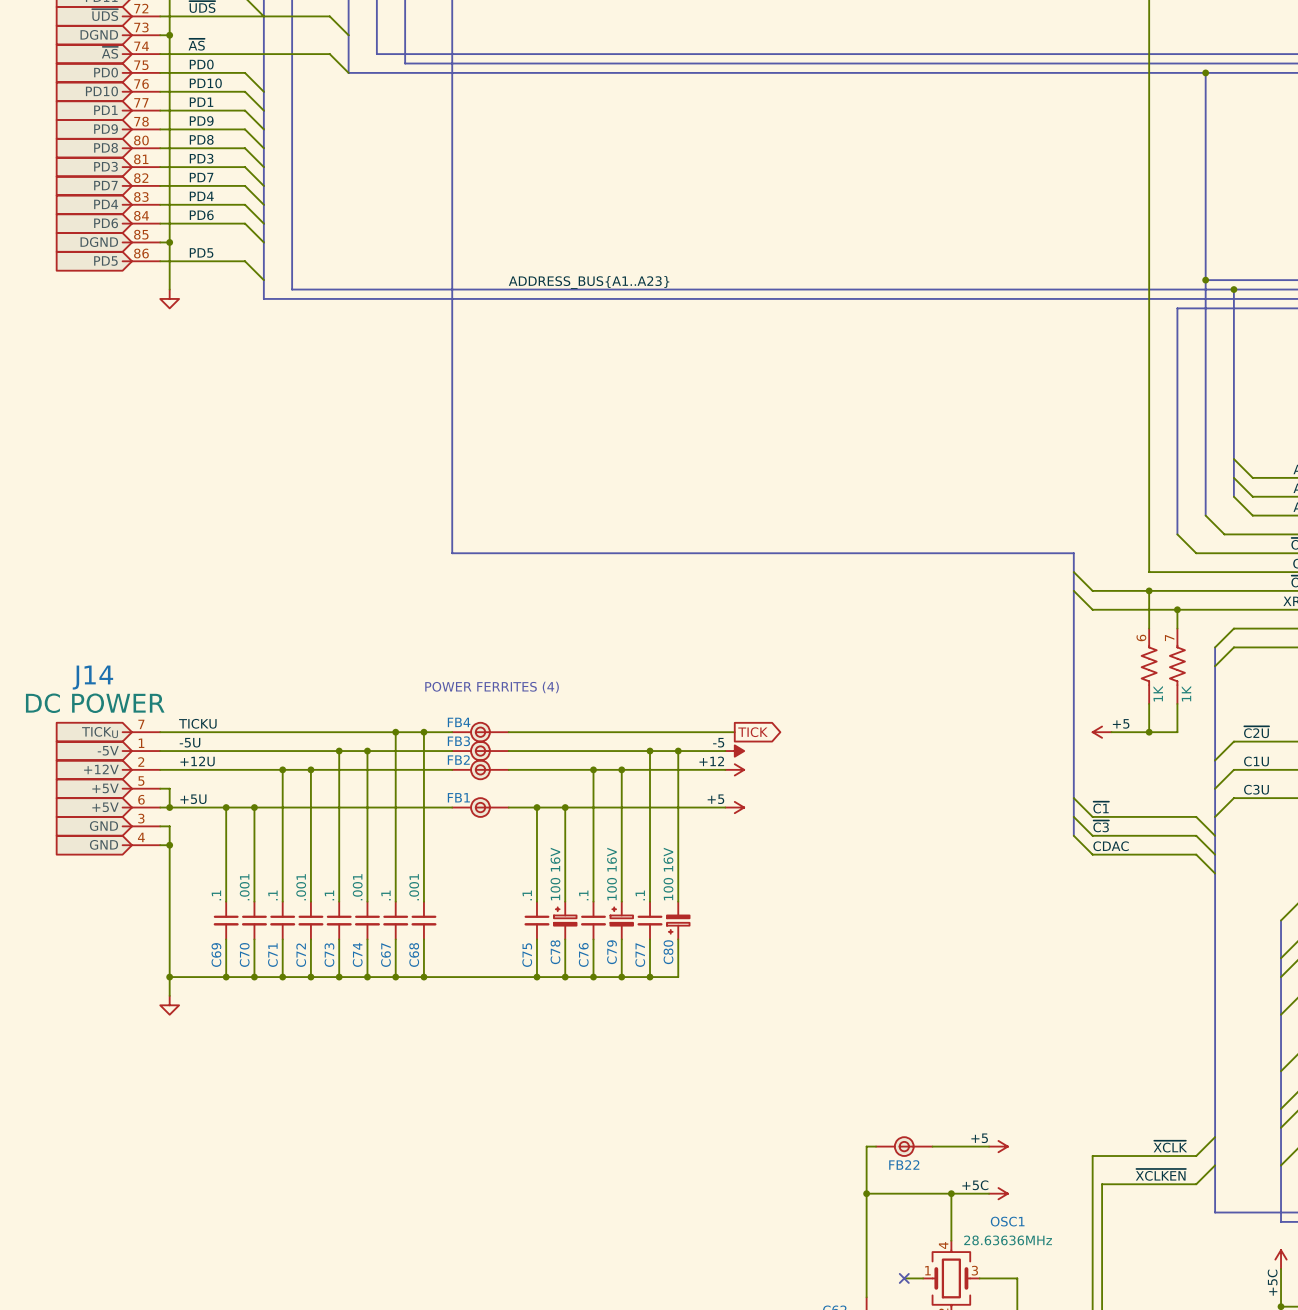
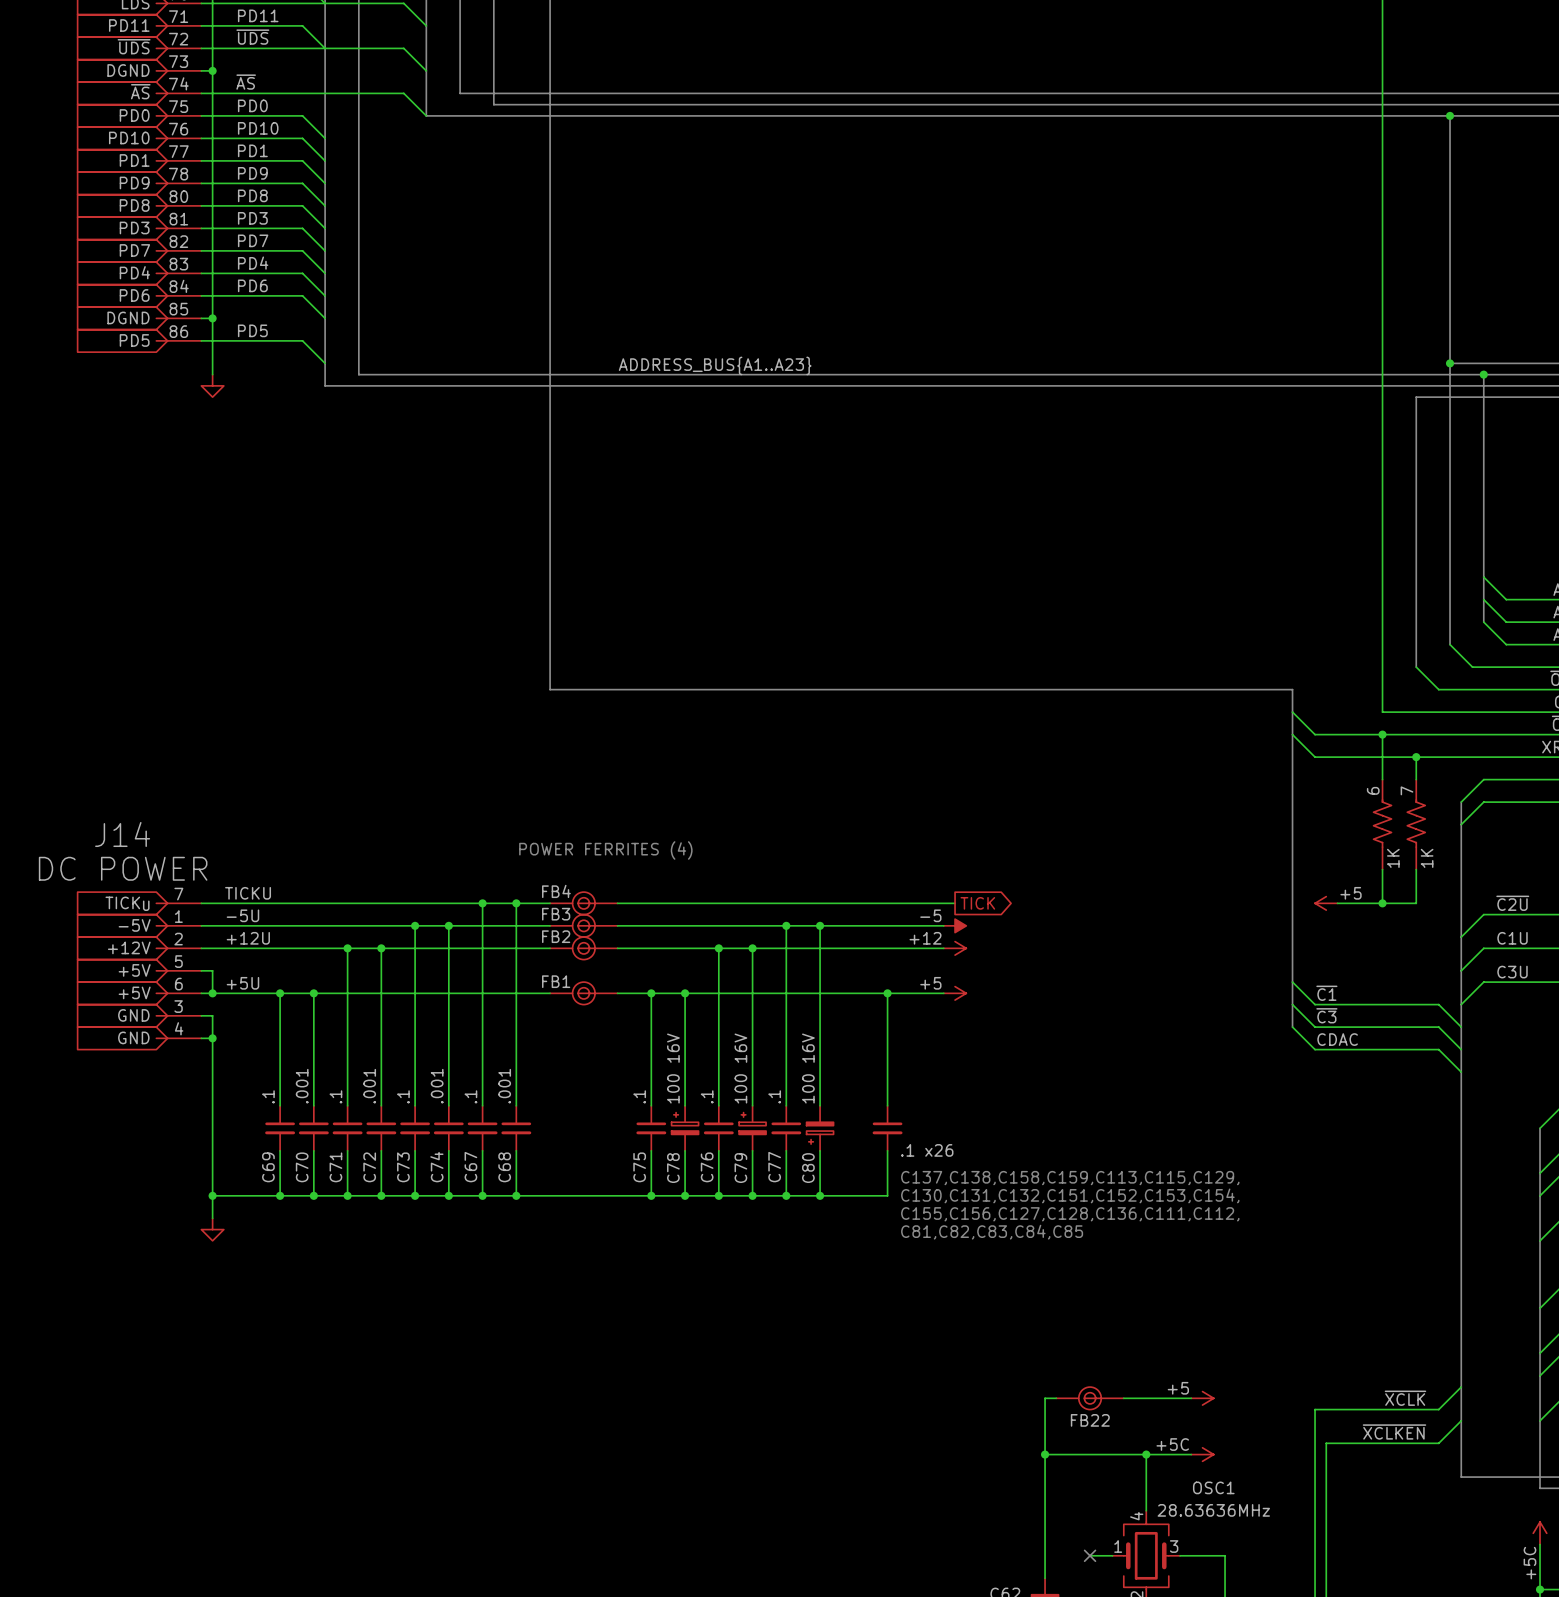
wire: none -> (887, 903) (955, 903)
global label position: TICK (753, 732) -> TICK (977, 903)
label position: -5 (718, 742) -> -5 (930, 915)
wire: none -> (876, 925) (943, 925)
power symbol position: (734, 751) -> (955, 925)
label position: +12 (711, 761) -> +12 (925, 938)
wire: none -> (876, 948) (943, 948)
power symbol: (734, 769) -> none
power symbol: none -> (955, 948)
label position: +5 (715, 799) -> +5 (930, 983)
wire: none -> (876, 993) (943, 993)
wire: none -> (887, 993) (887, 1105)
power symbol: (734, 807) -> none
junction: none -> (887, 993)
power symbol: none -> (955, 993)
part: none -> .1 x26 (887, 1128)
wire: none -> (887, 1150) (887, 1195) (820, 1195)
text: none -> C137,C138,C158,C159,C113,C115,C129, (1070, 1178)
junction: none -> (820, 1195)
text: none -> C130,C131,C132,C151,C152,C153,C154, (1070, 1195)
text: none -> C155,C156,C127,C128,C136,C111,C112, (1070, 1214)
text: none -> C81,C82,C83,C84,C85 (992, 1232)

